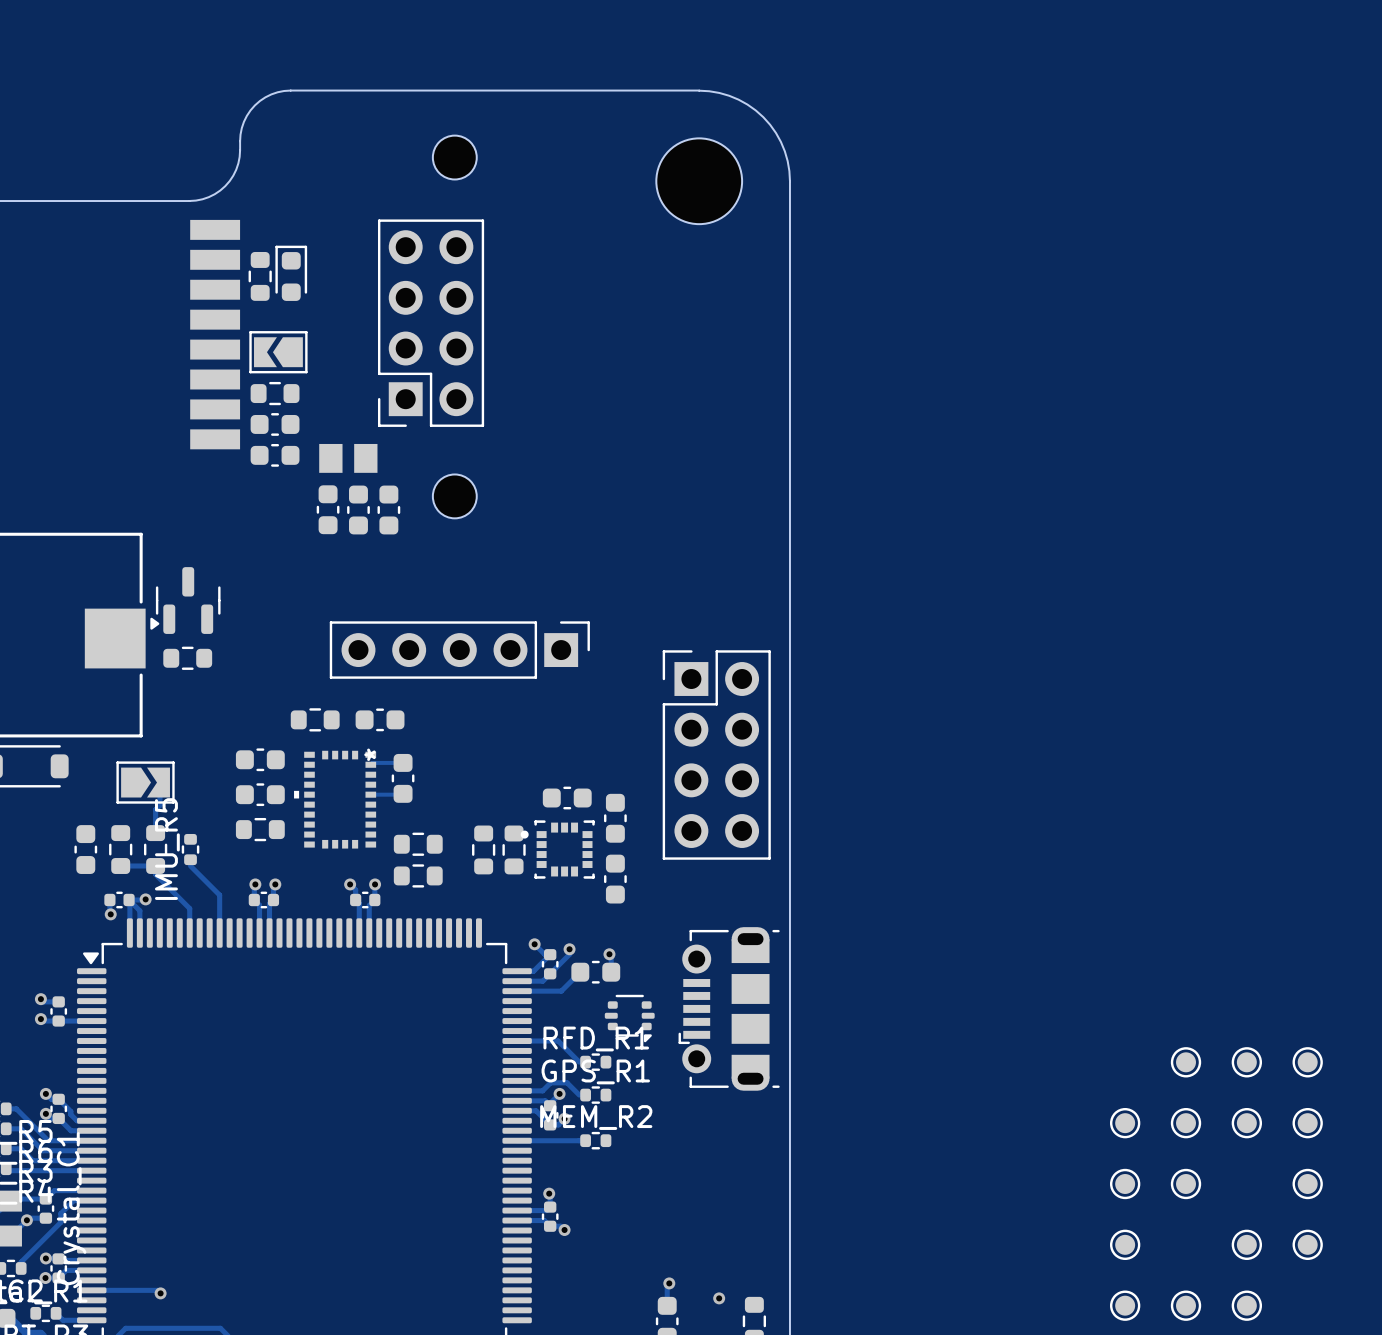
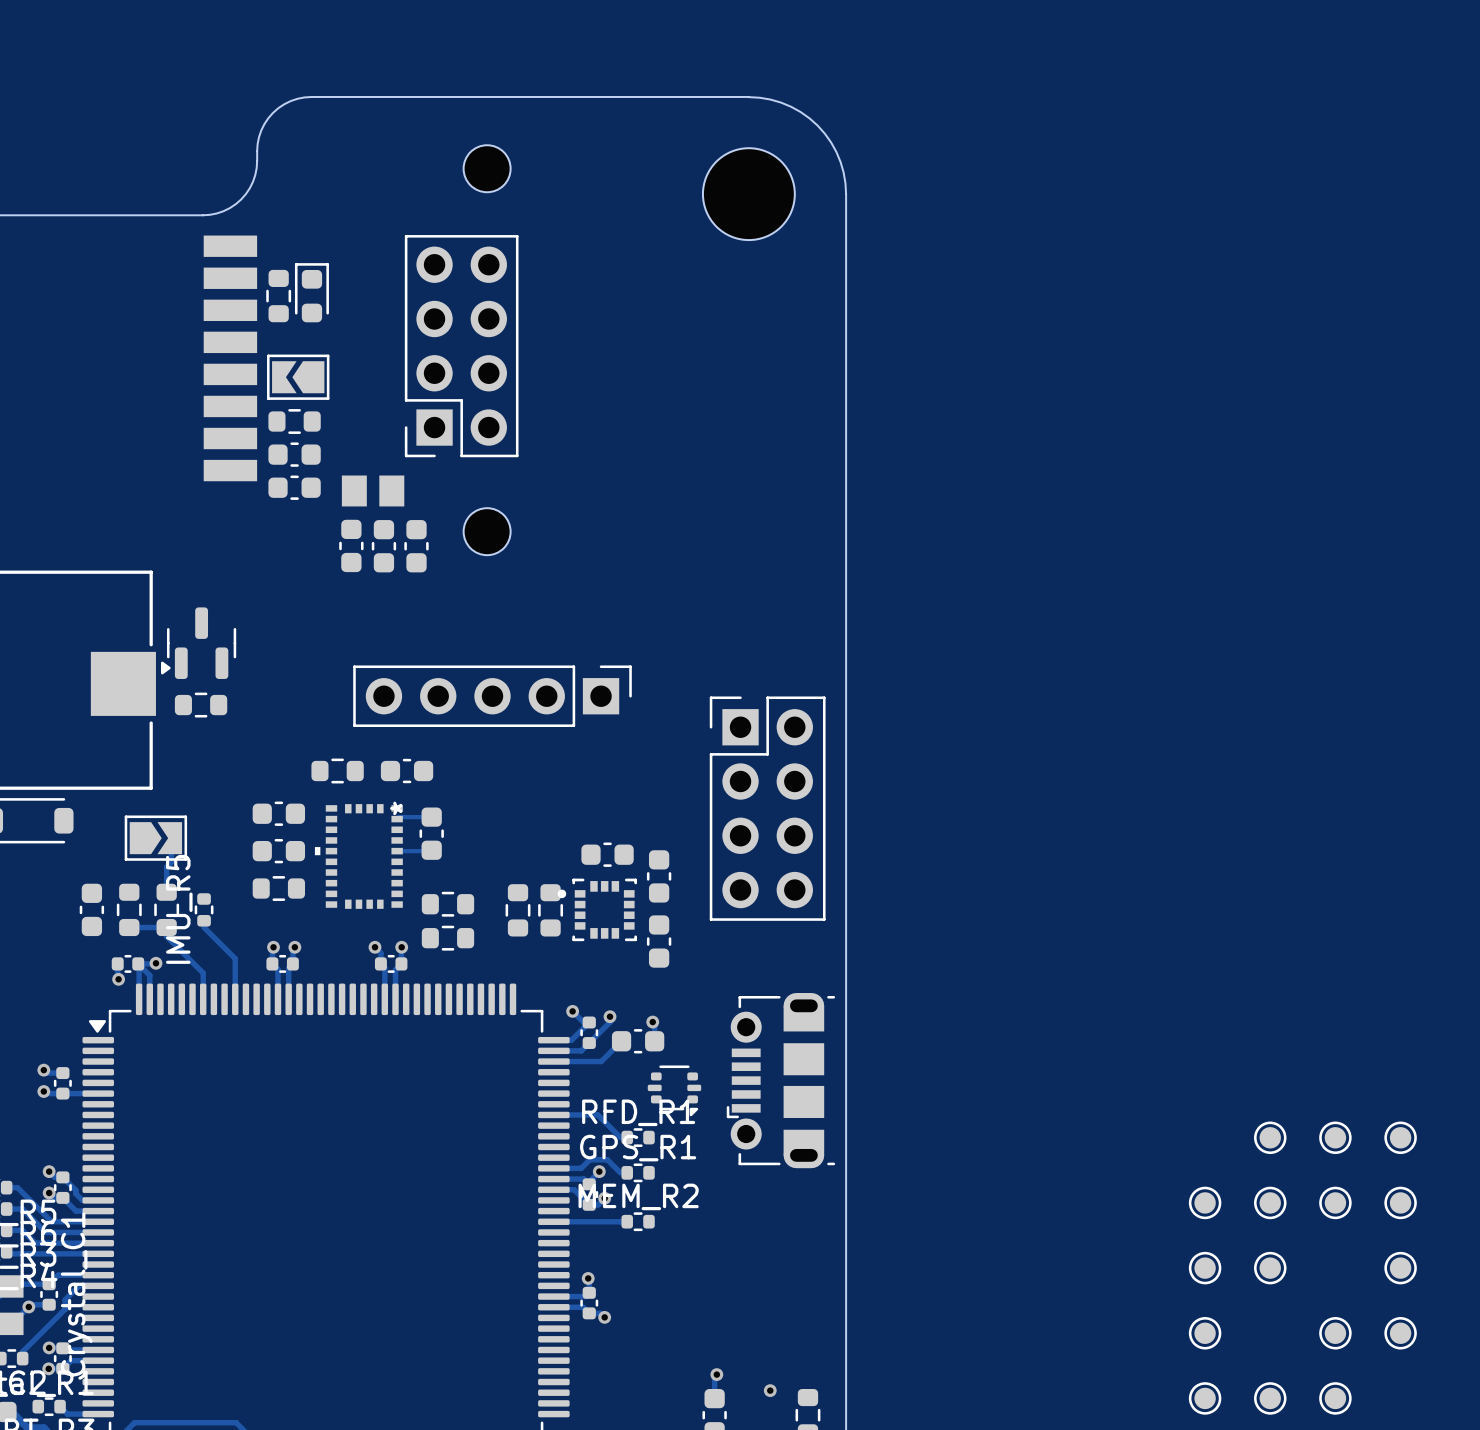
track: (91, 1290) (157, 1290) (160, 1293) -> none
via: (160, 1293) -> none

